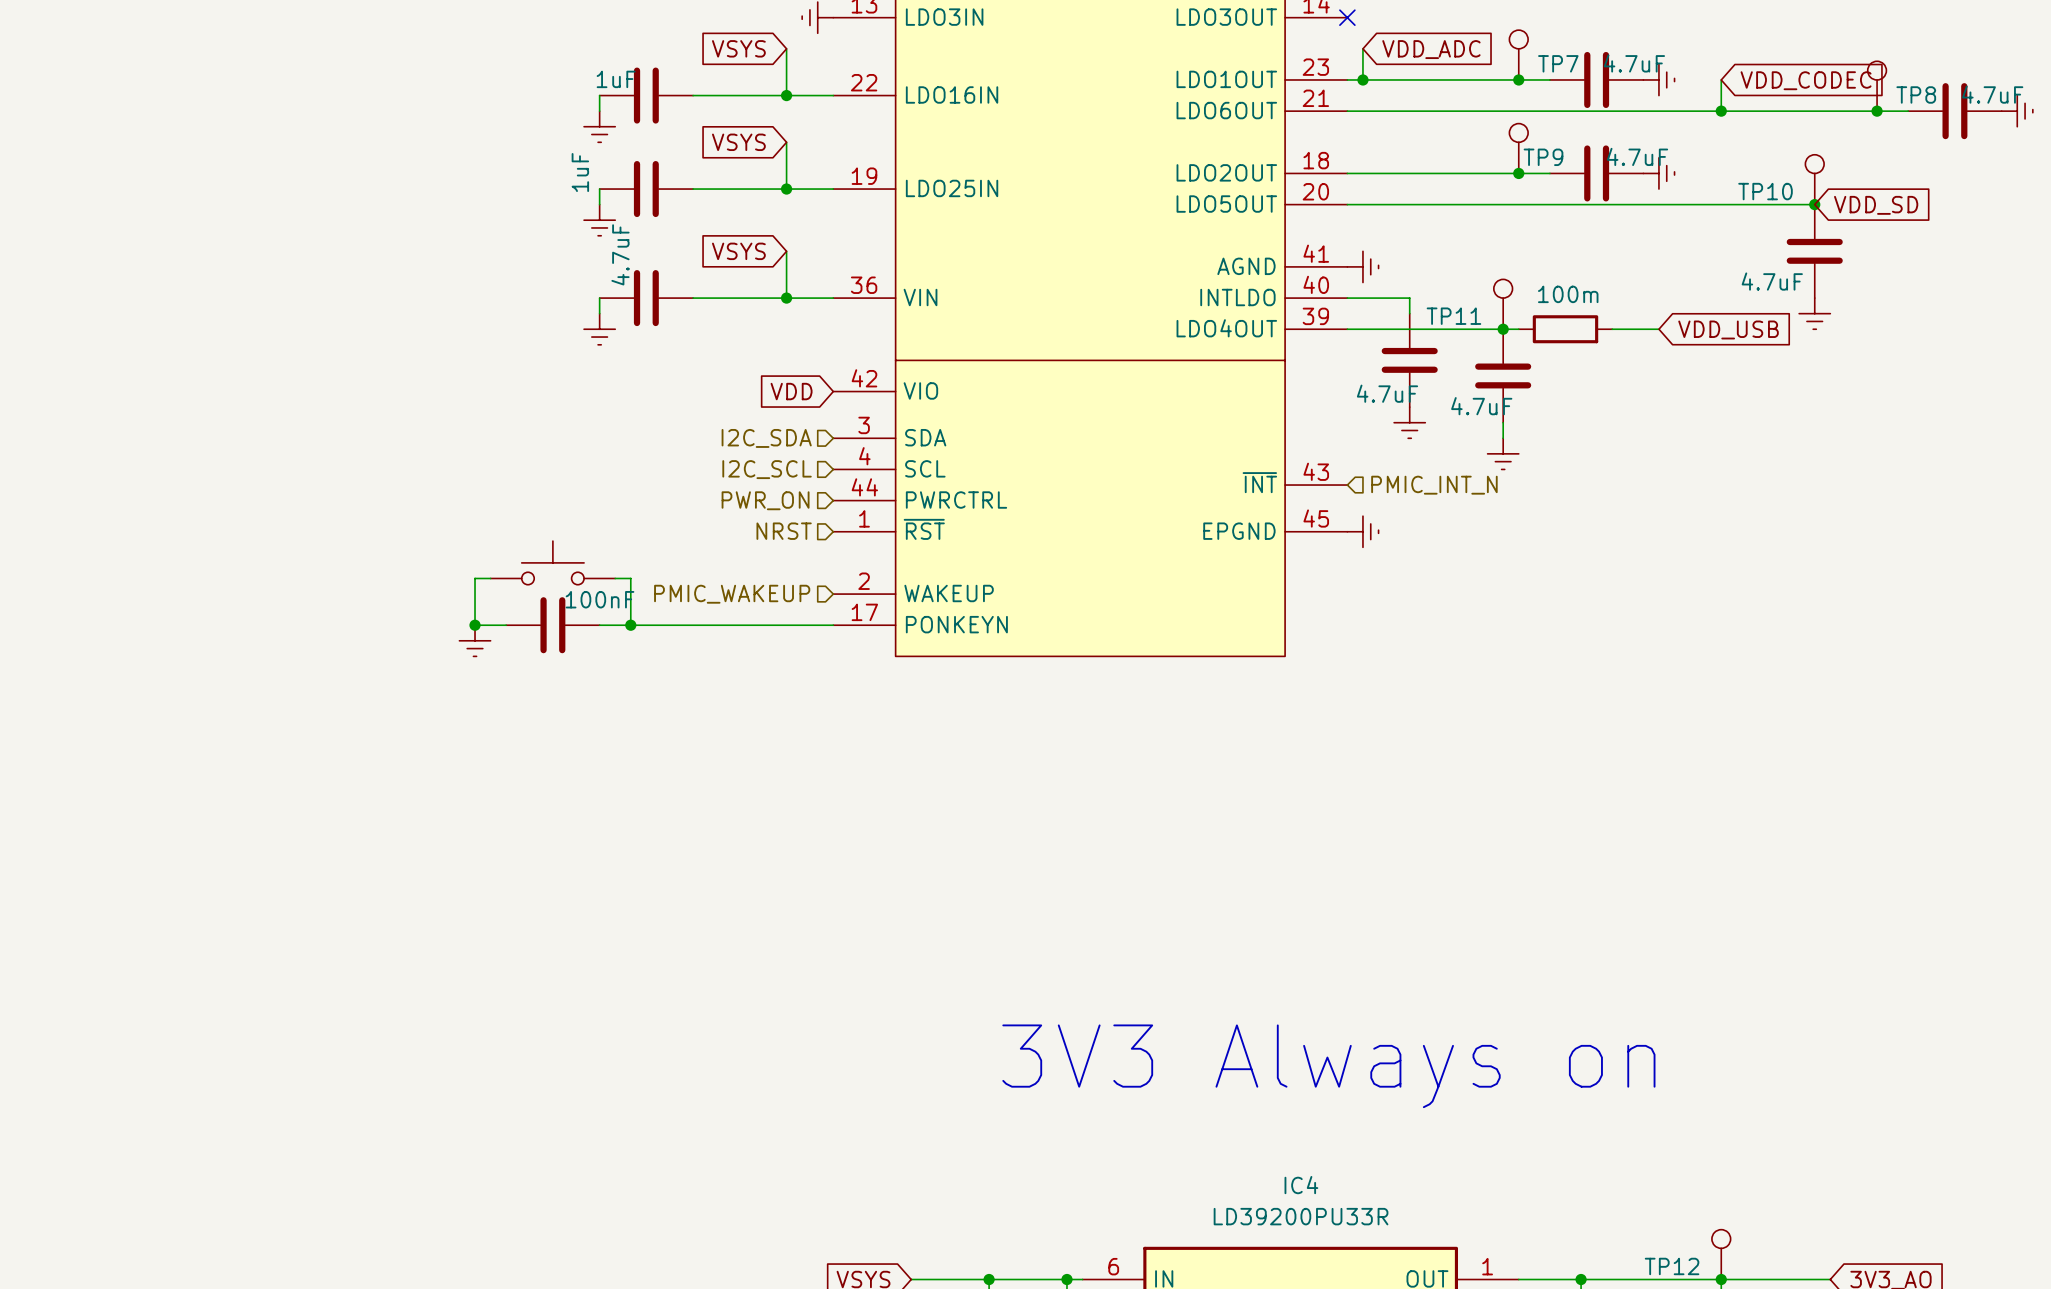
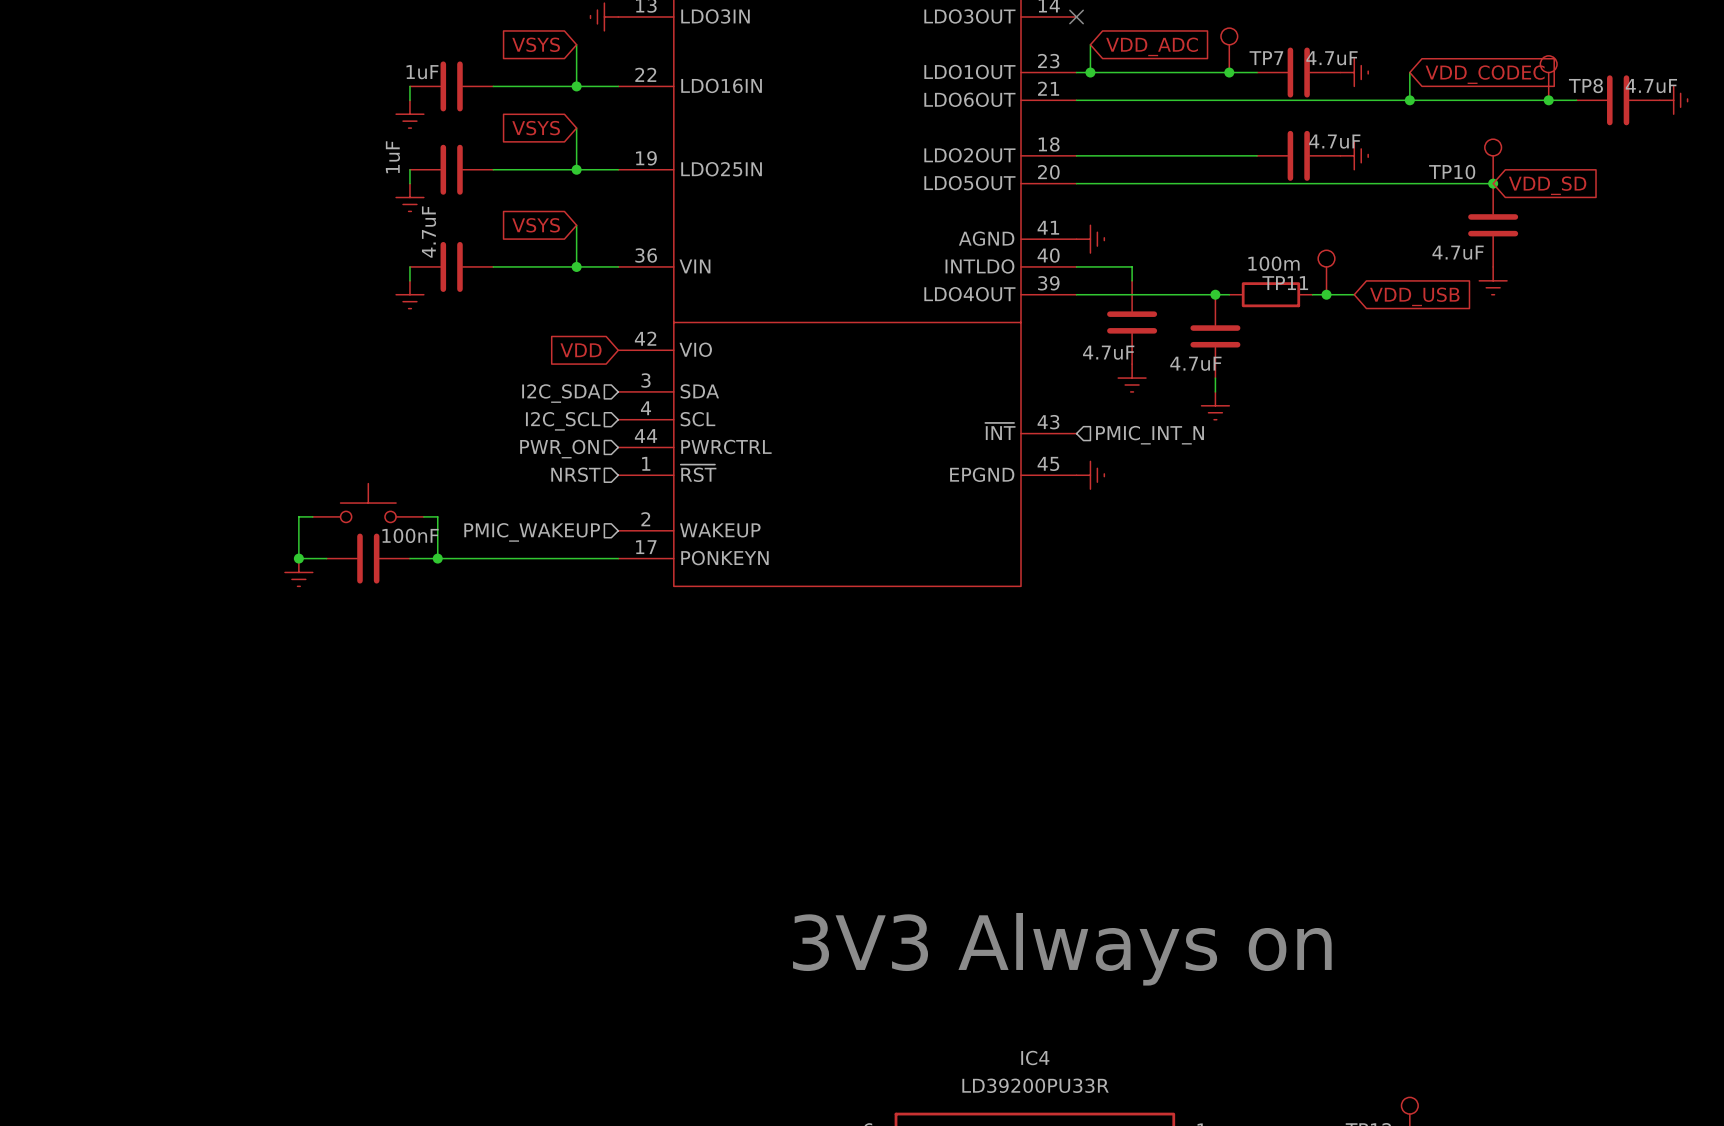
TP9: (1518, 148) -> none
junction: (1518, 173) -> none
TP11 position: (1503, 304) -> (1326, 272)
junction: none -> (1326, 294)

